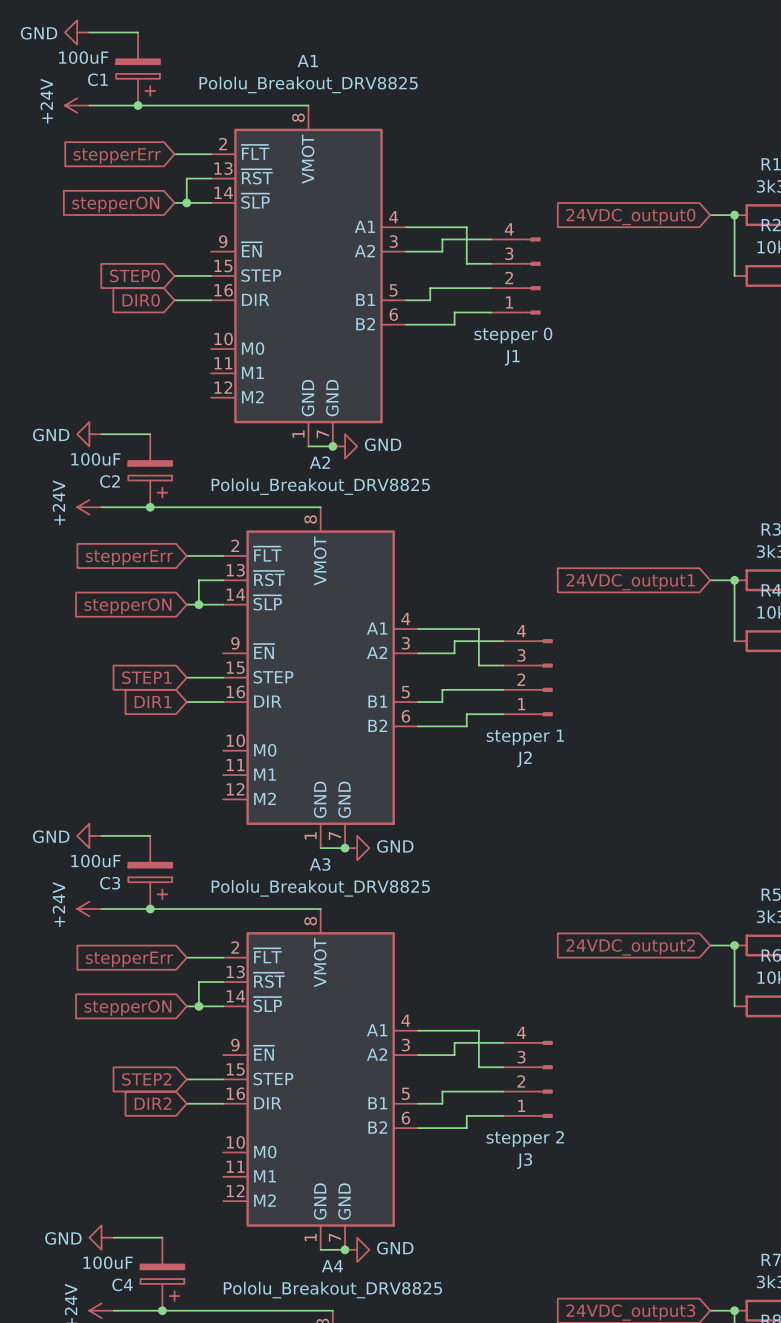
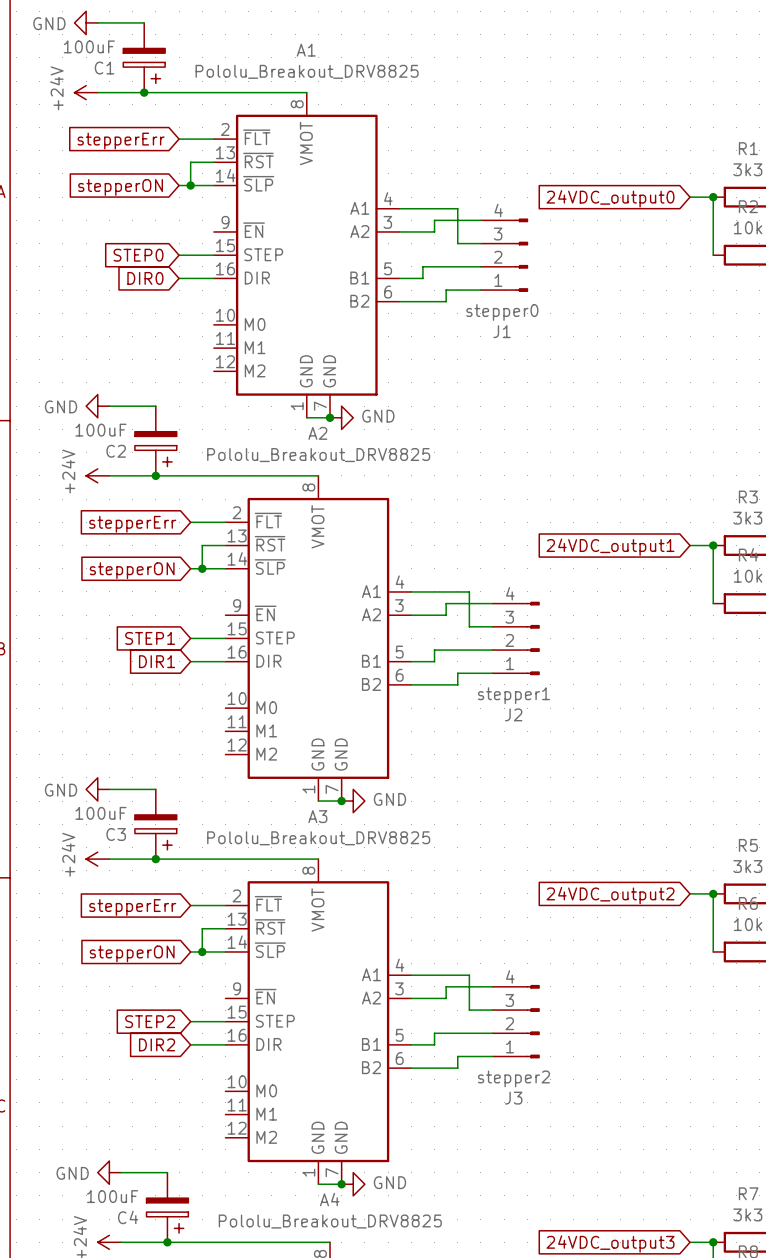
J1 value: stepper 0 (513, 335) -> stepper0 (502, 312)
J2 value: stepper 1 (525, 737) -> stepper1 (513, 695)
J3 value: stepper 2 (525, 1139) -> stepper2 (513, 1078)

